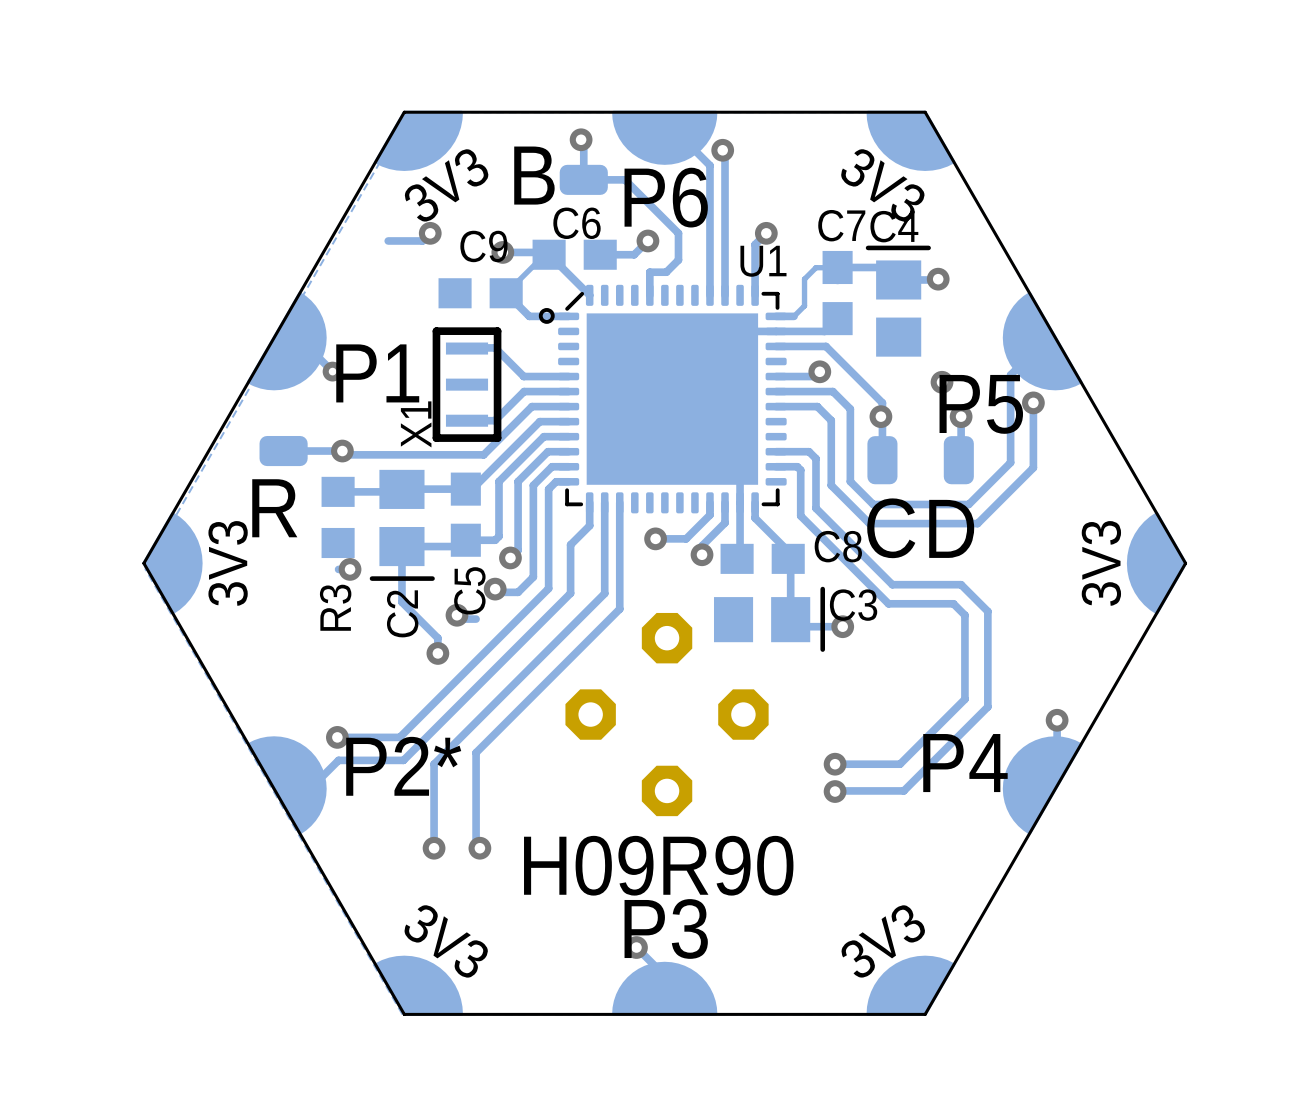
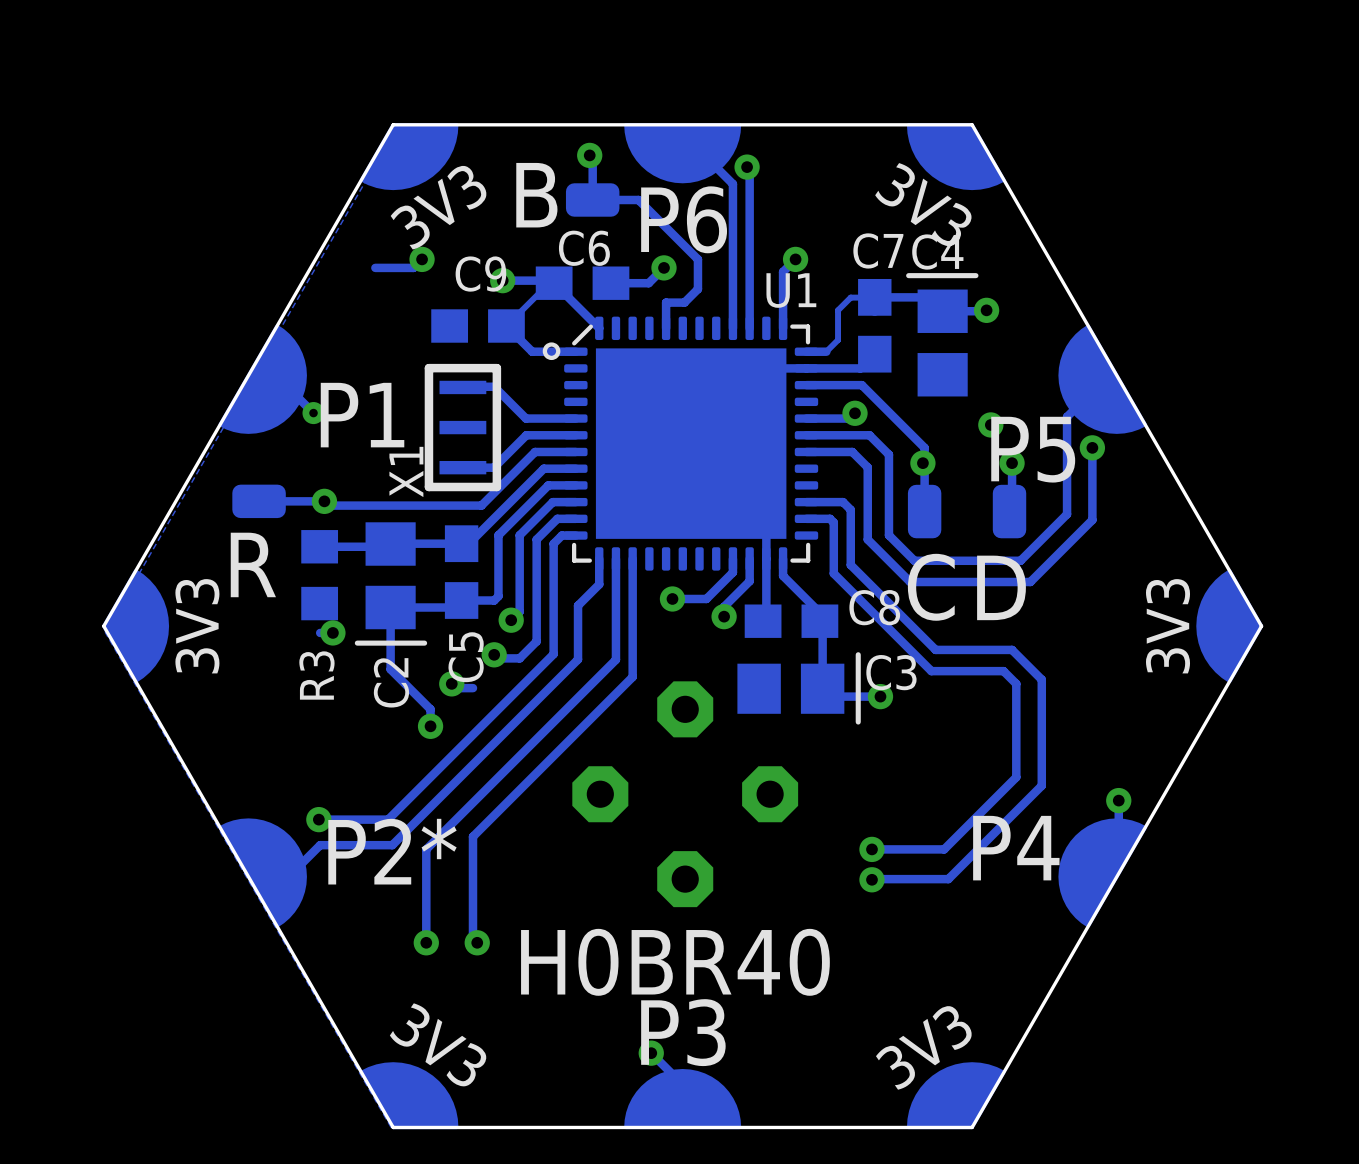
text: H09R90 (658, 865) -> H0BR40 (675, 962)

